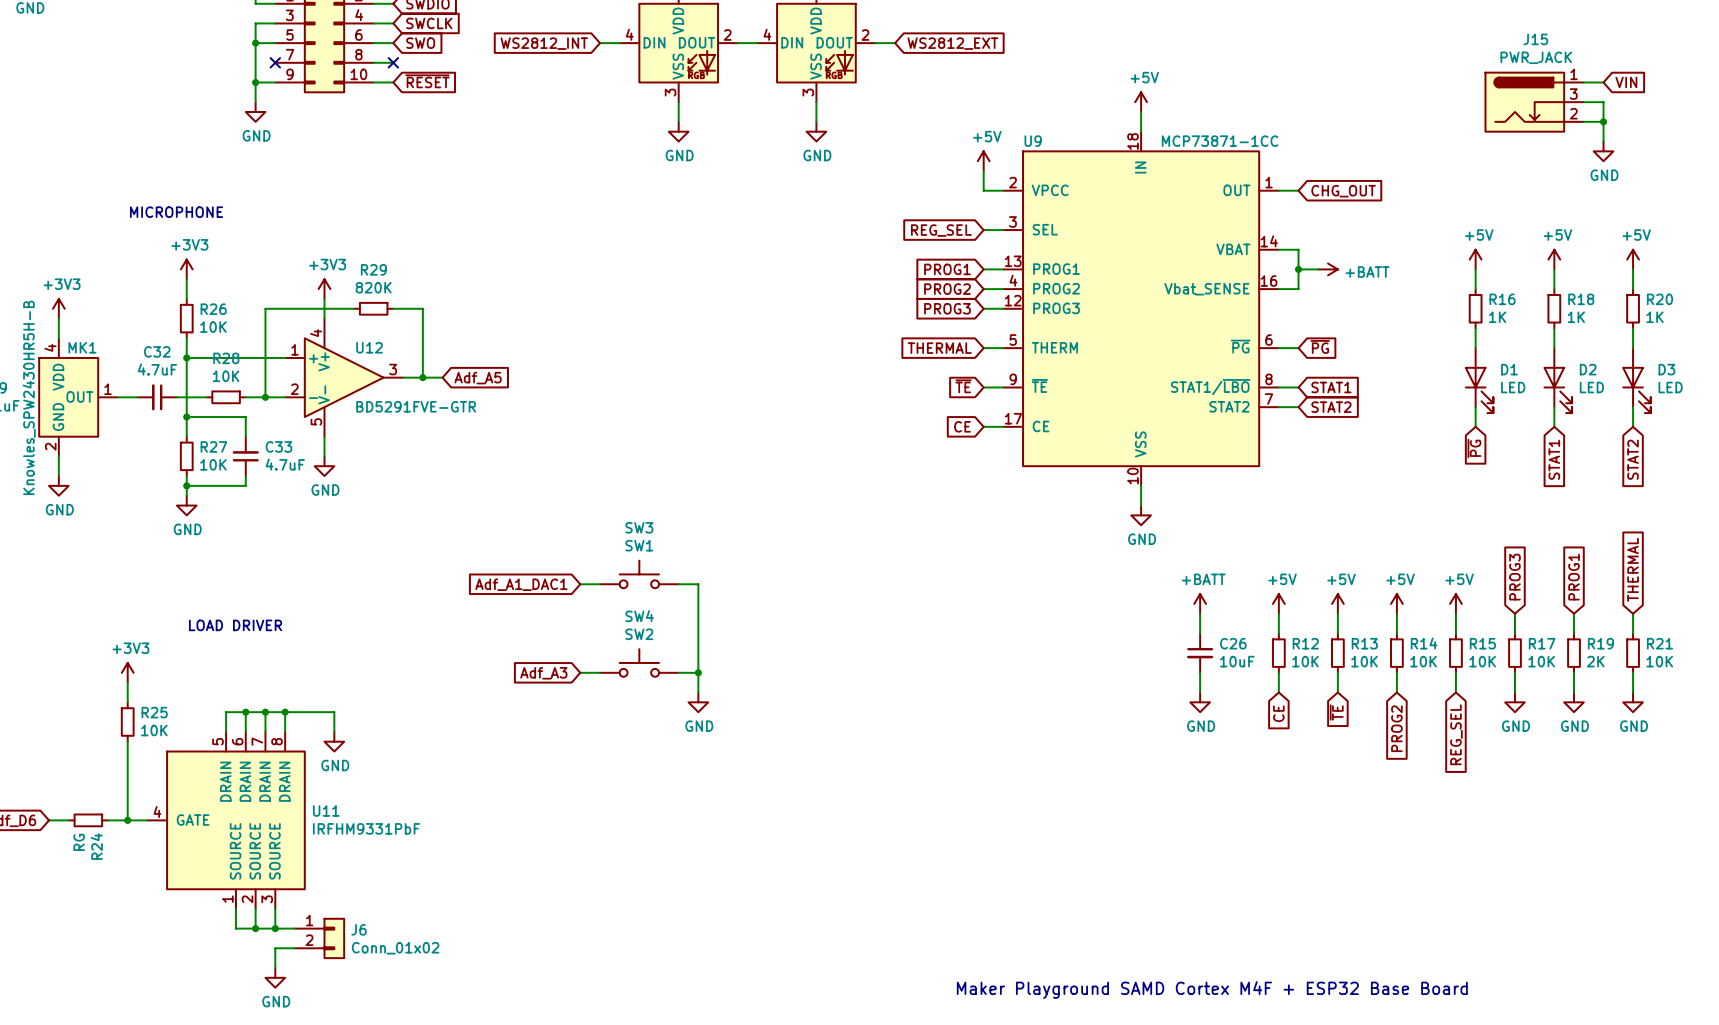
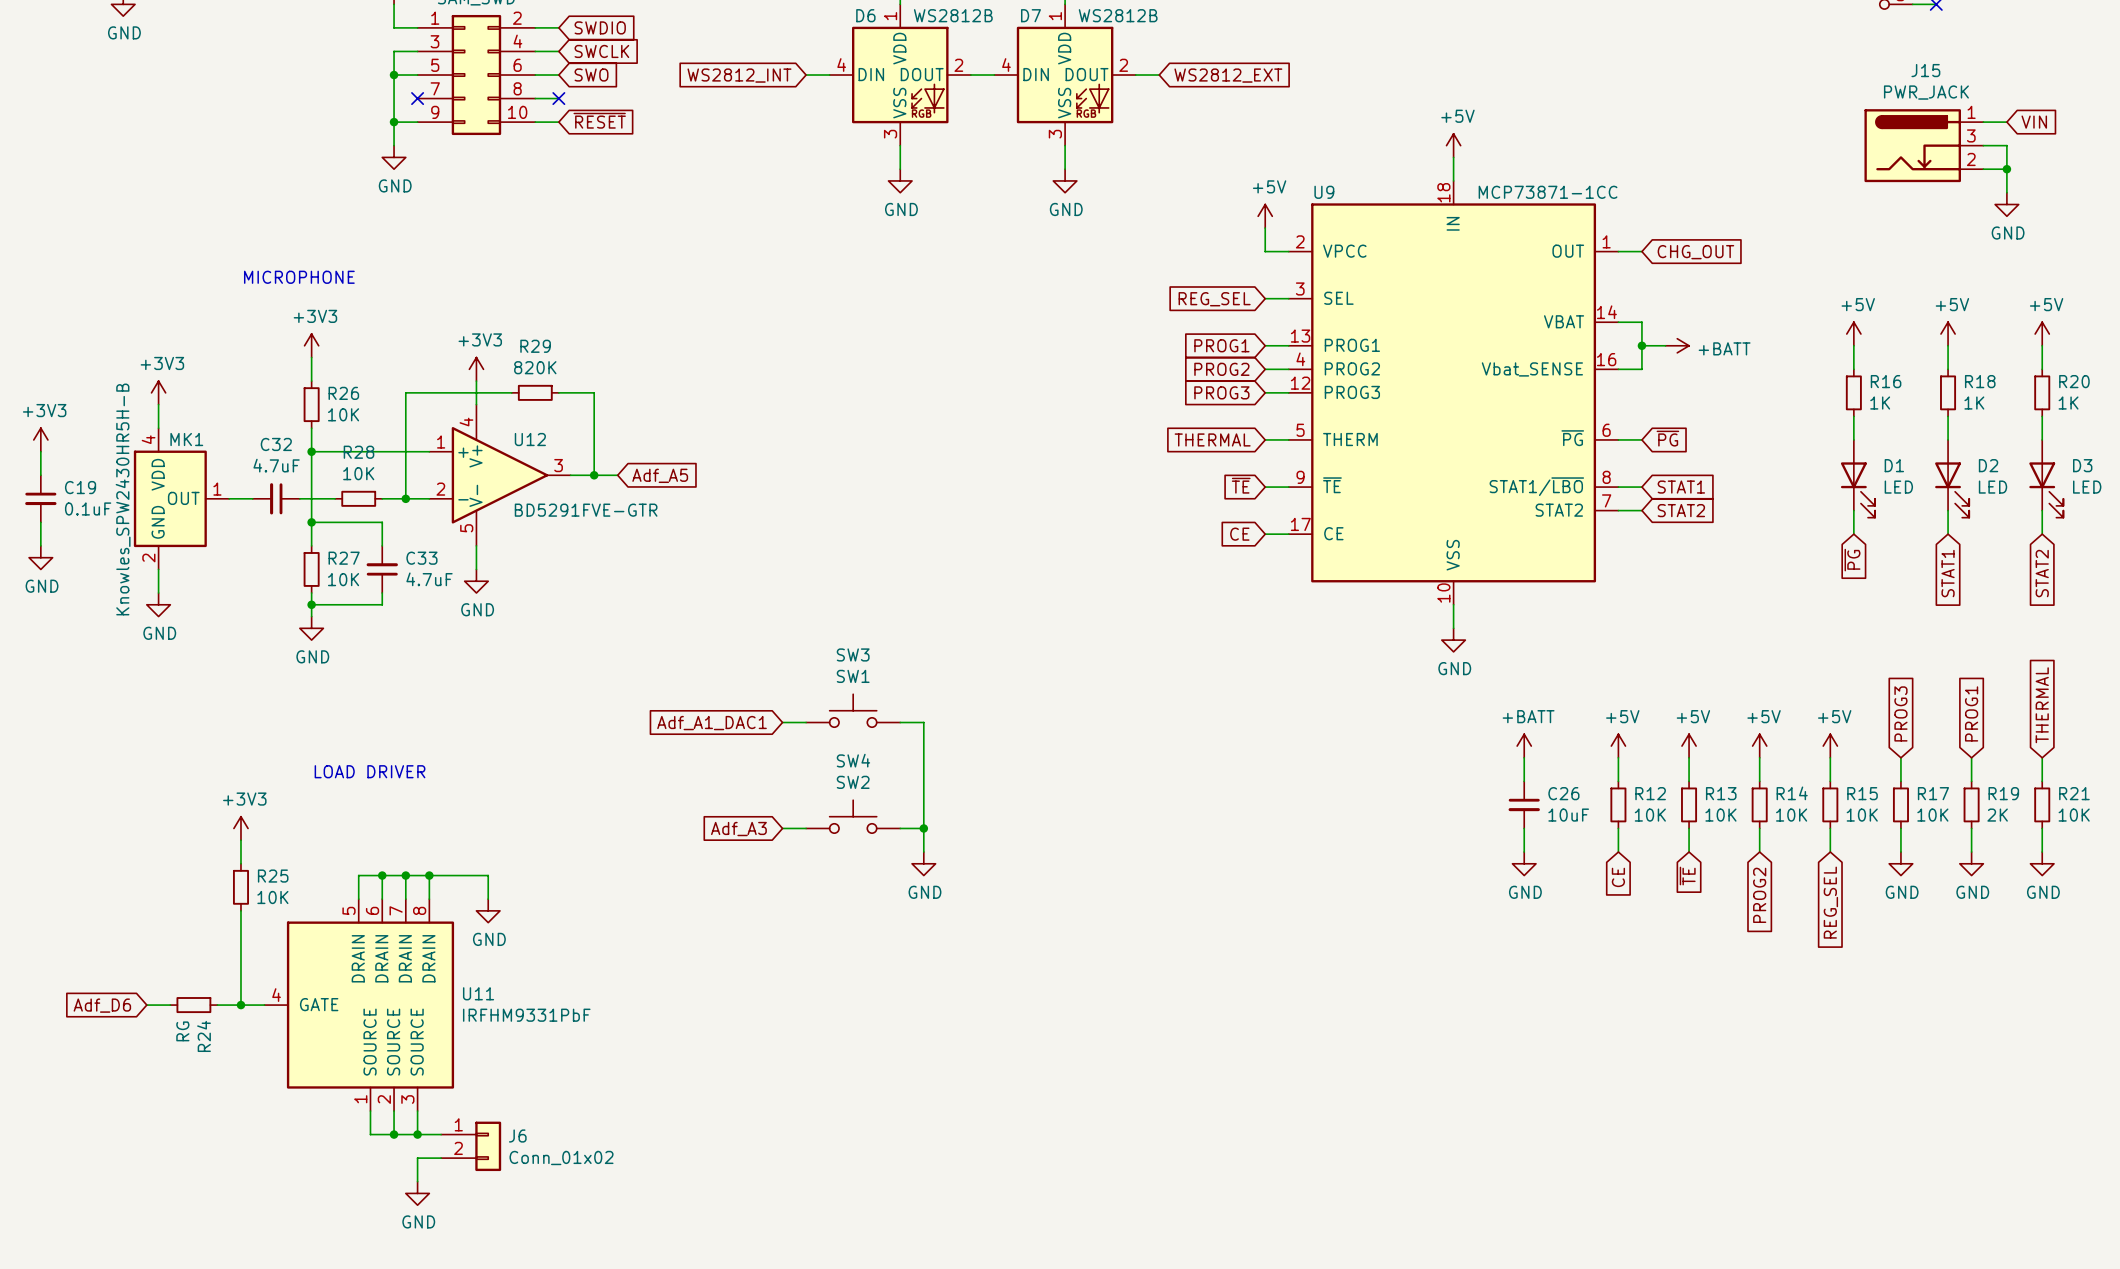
text: Maker Playground SAMD Cortex M4F + ESP32 Base Board (1212, 989) -> none

